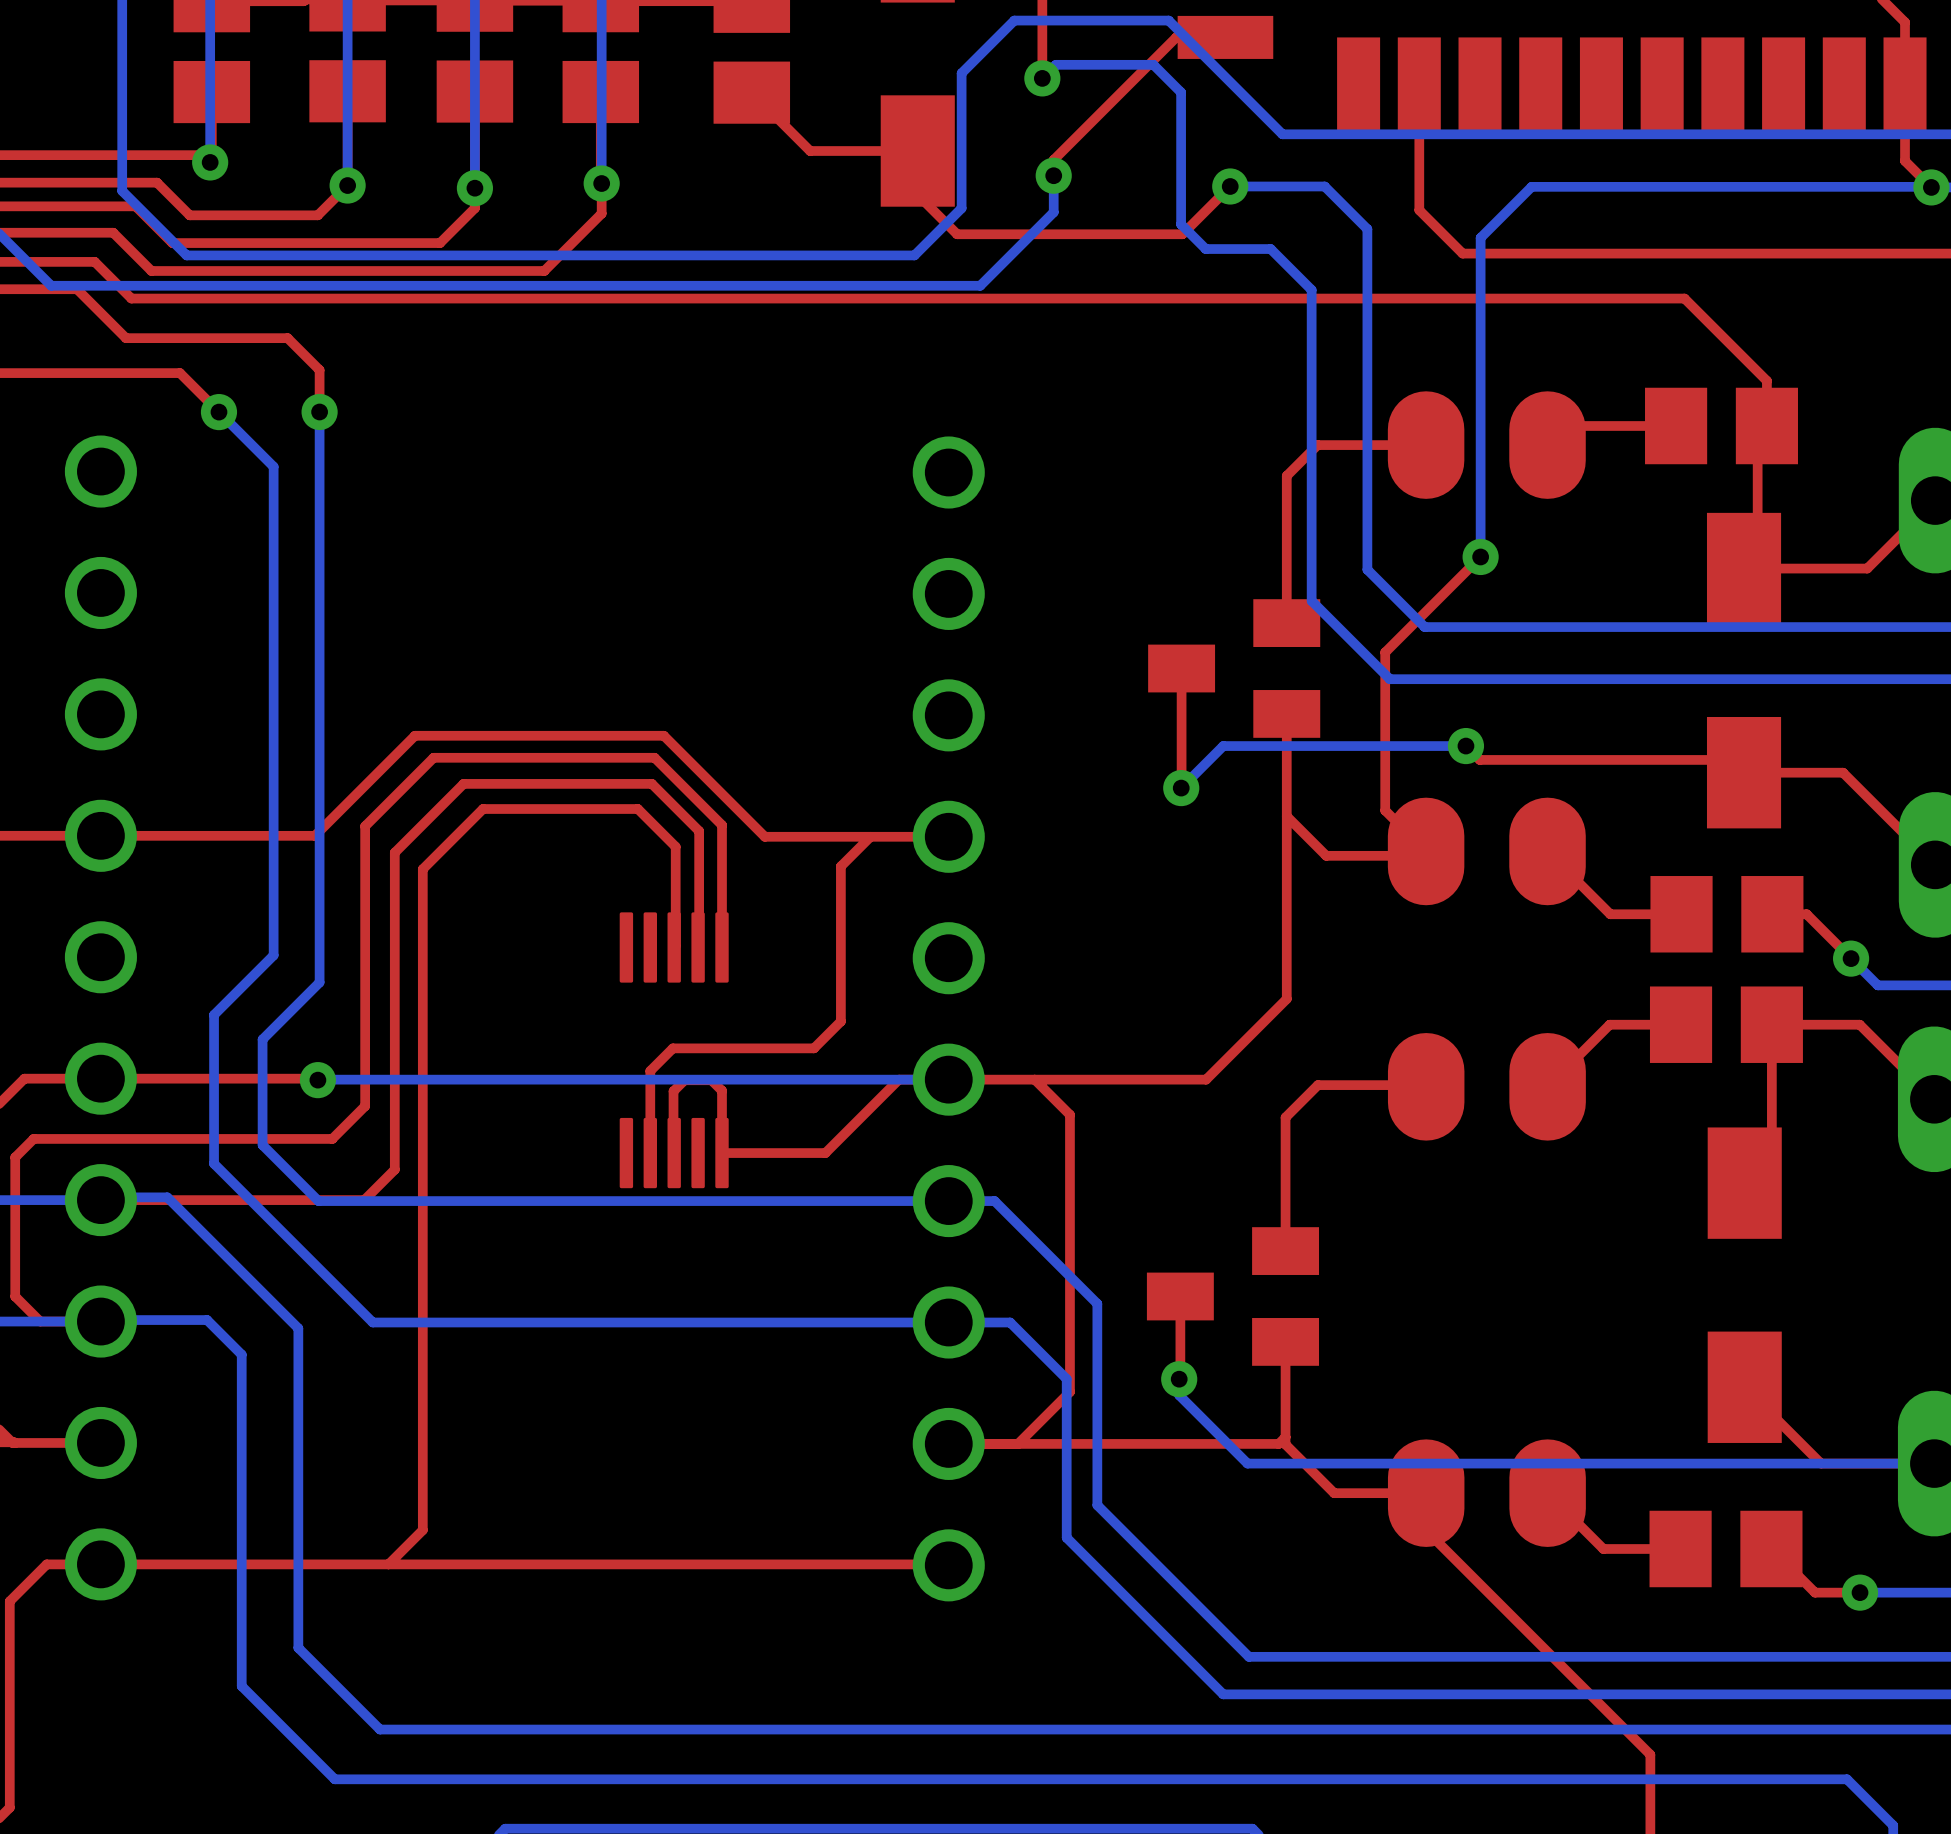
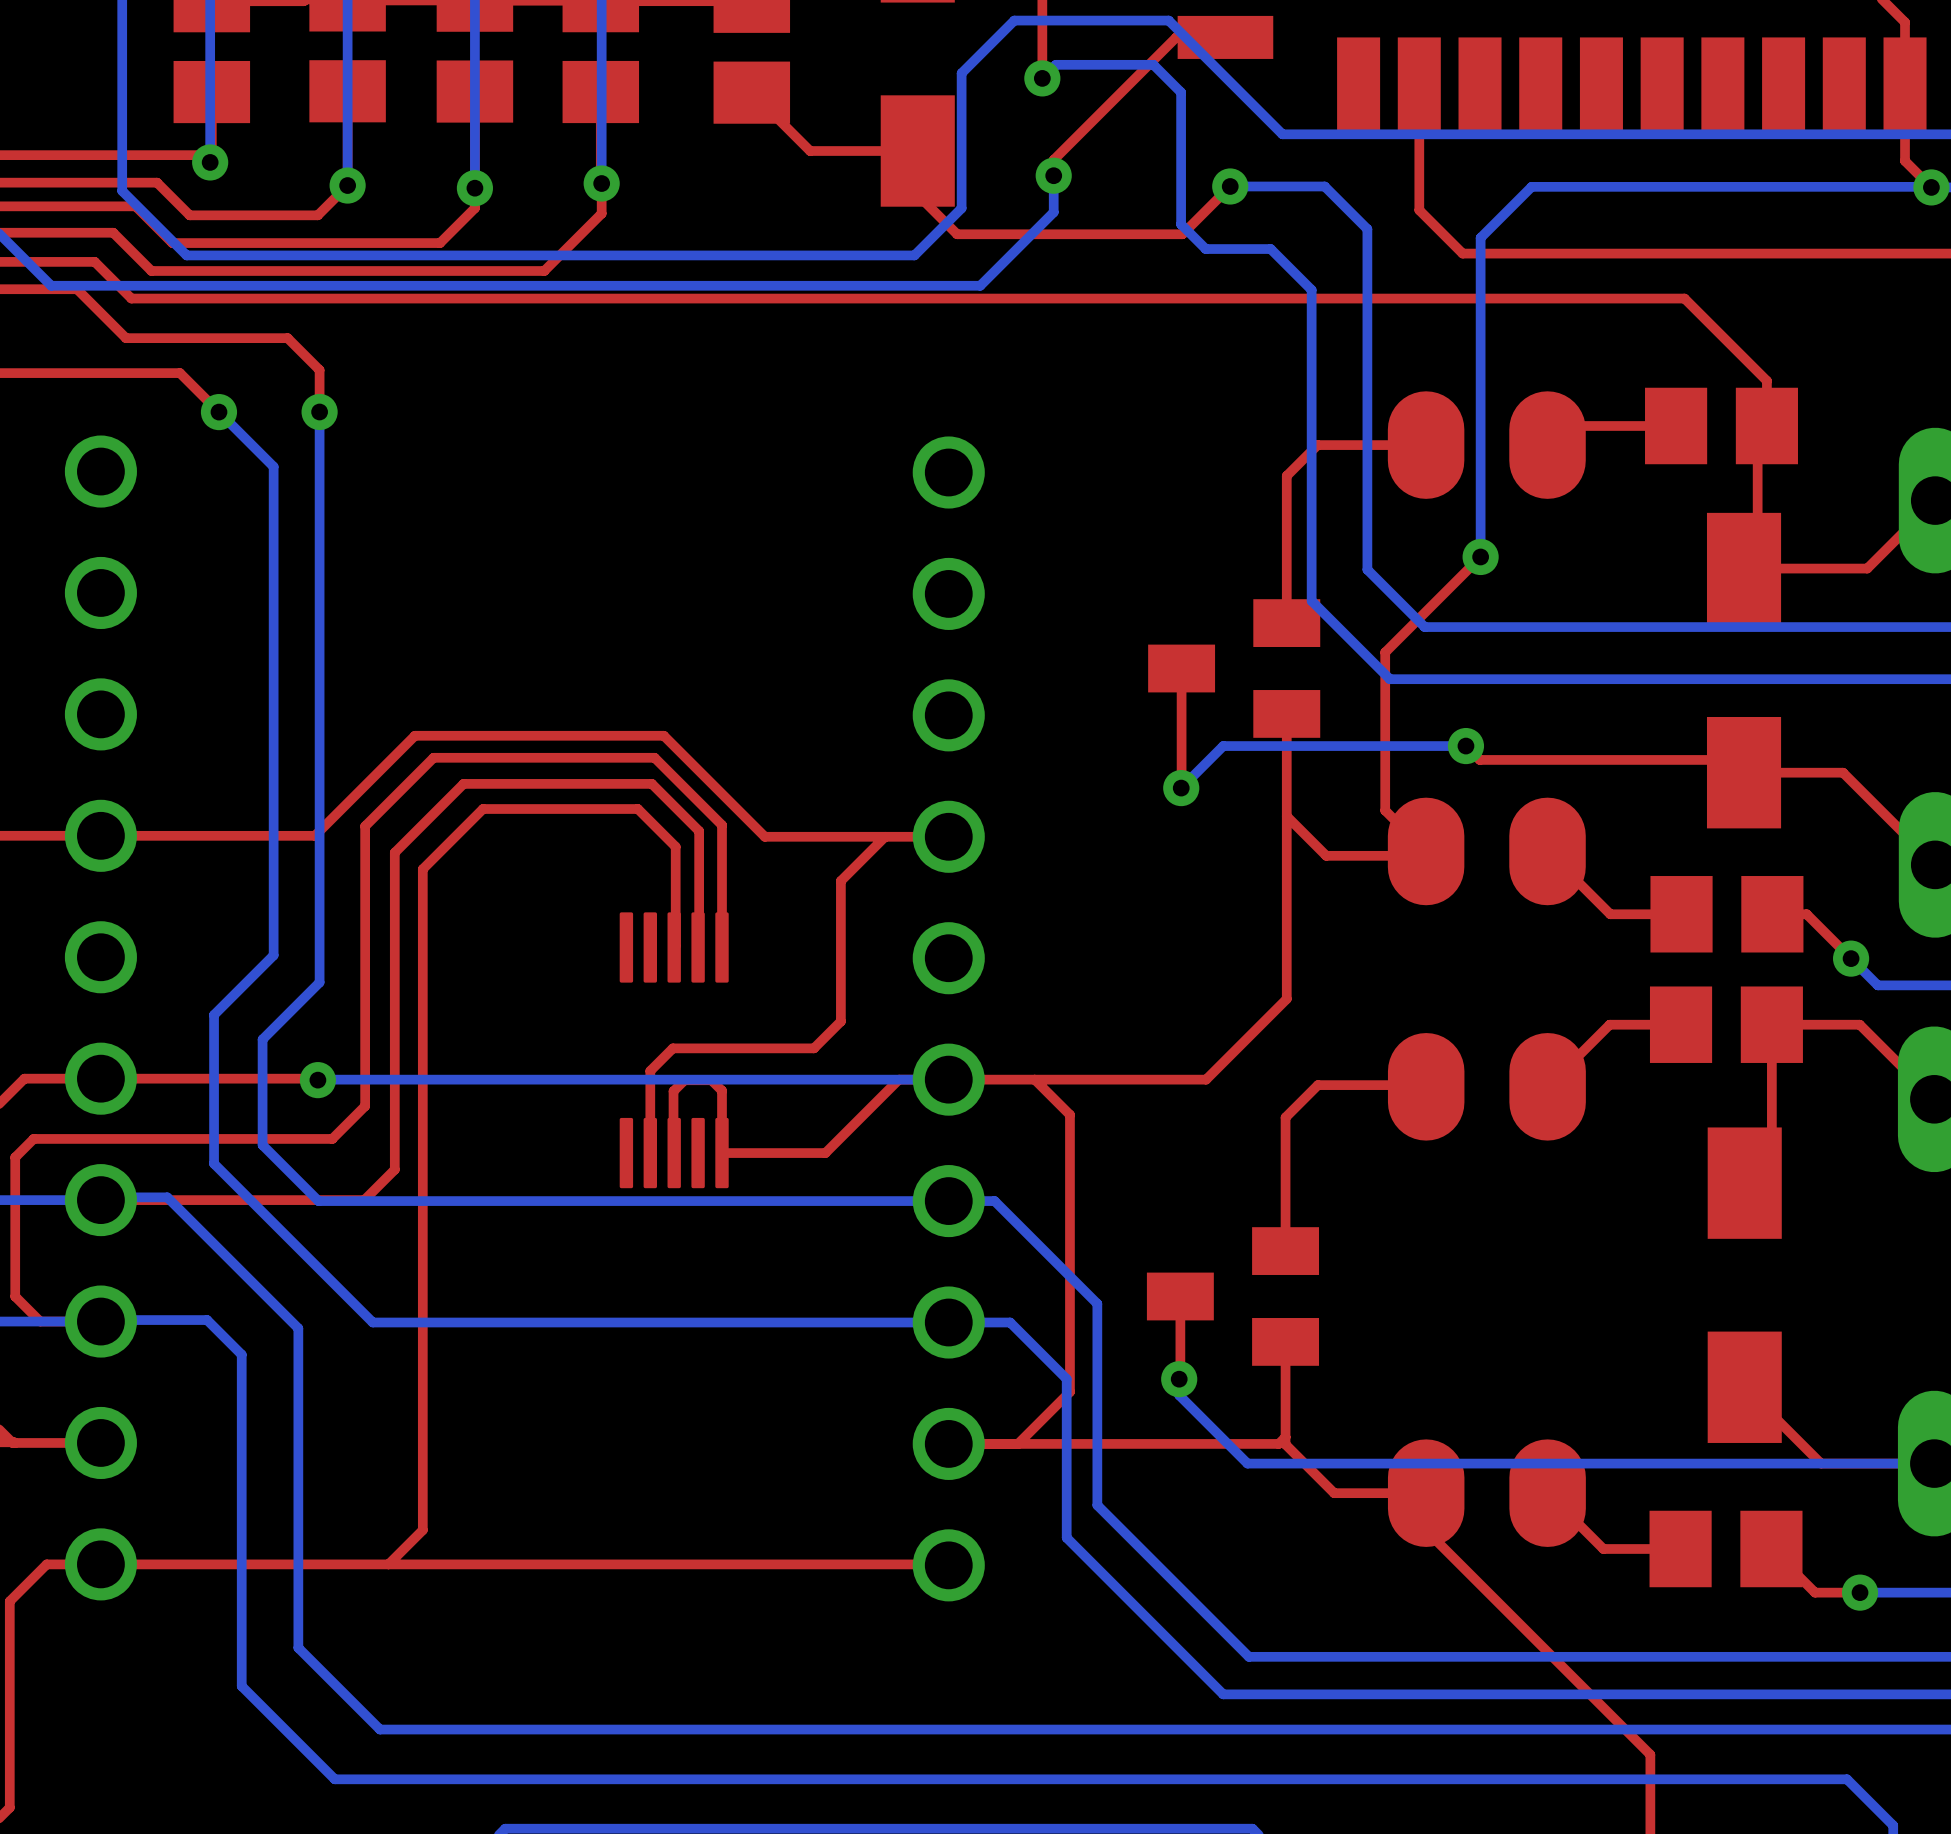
top track: (870, 836) (840, 866) (840, 881) -> (885, 836) (840, 881)

